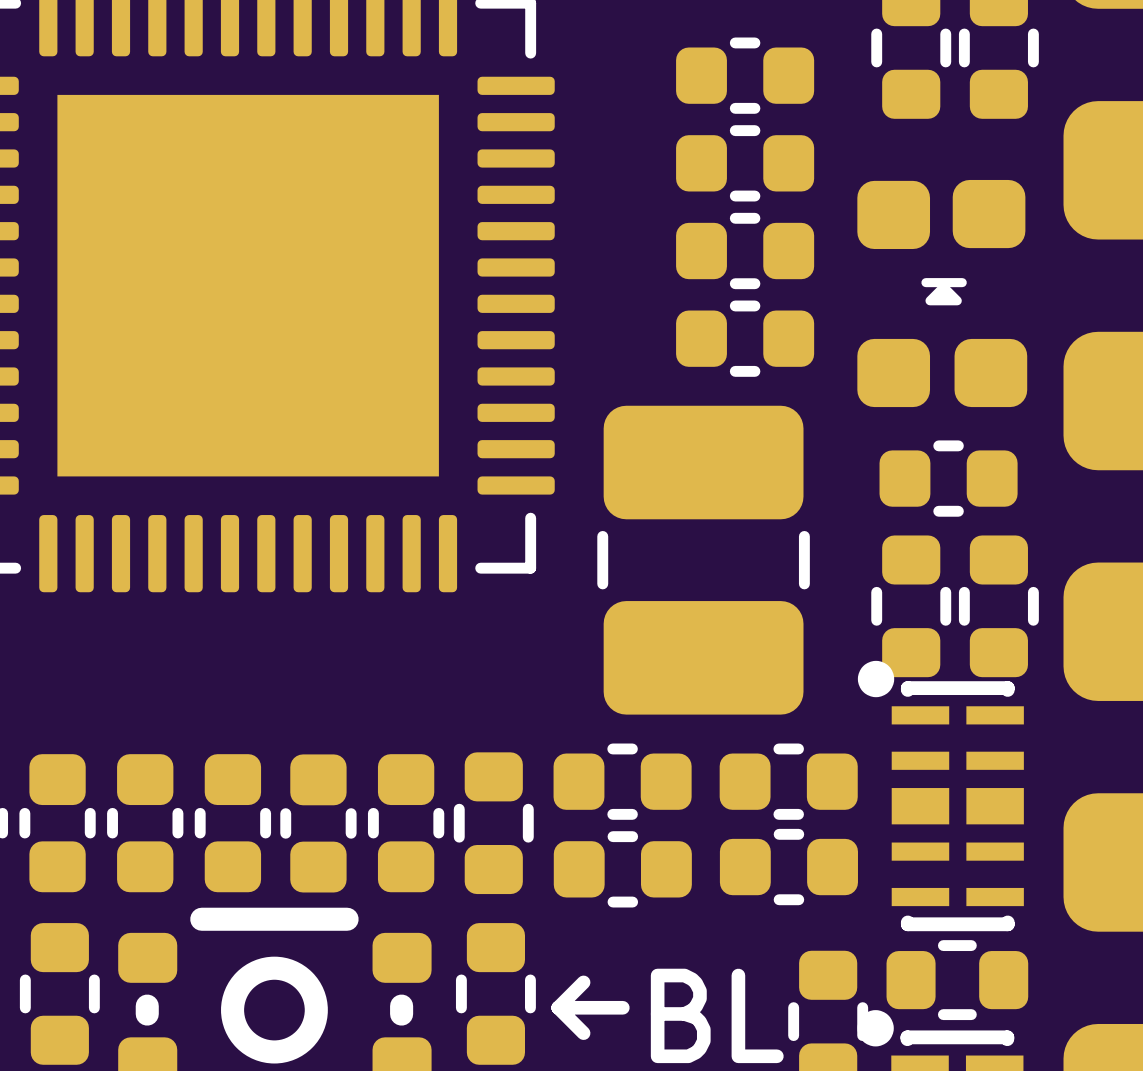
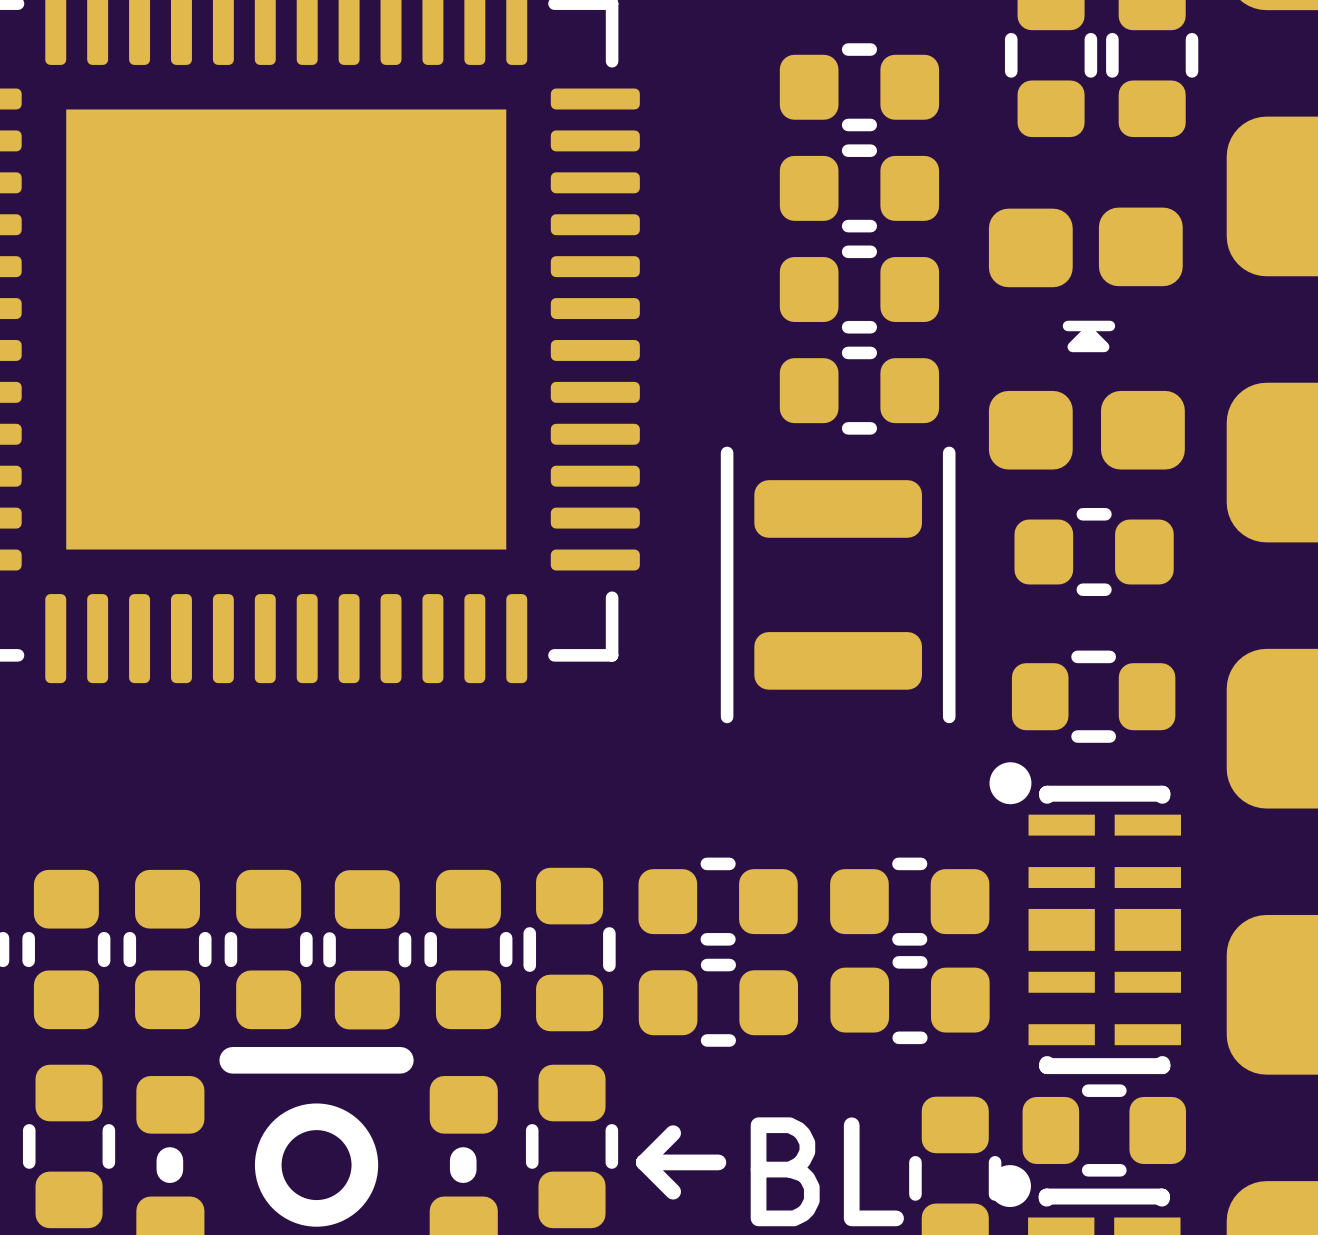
part footprint: [597, 405, 810, 715] -> [720, 446, 956, 724]
part: none -> (1093, 696)
part: (911, 606) -> none
part: (998, 606) -> none

